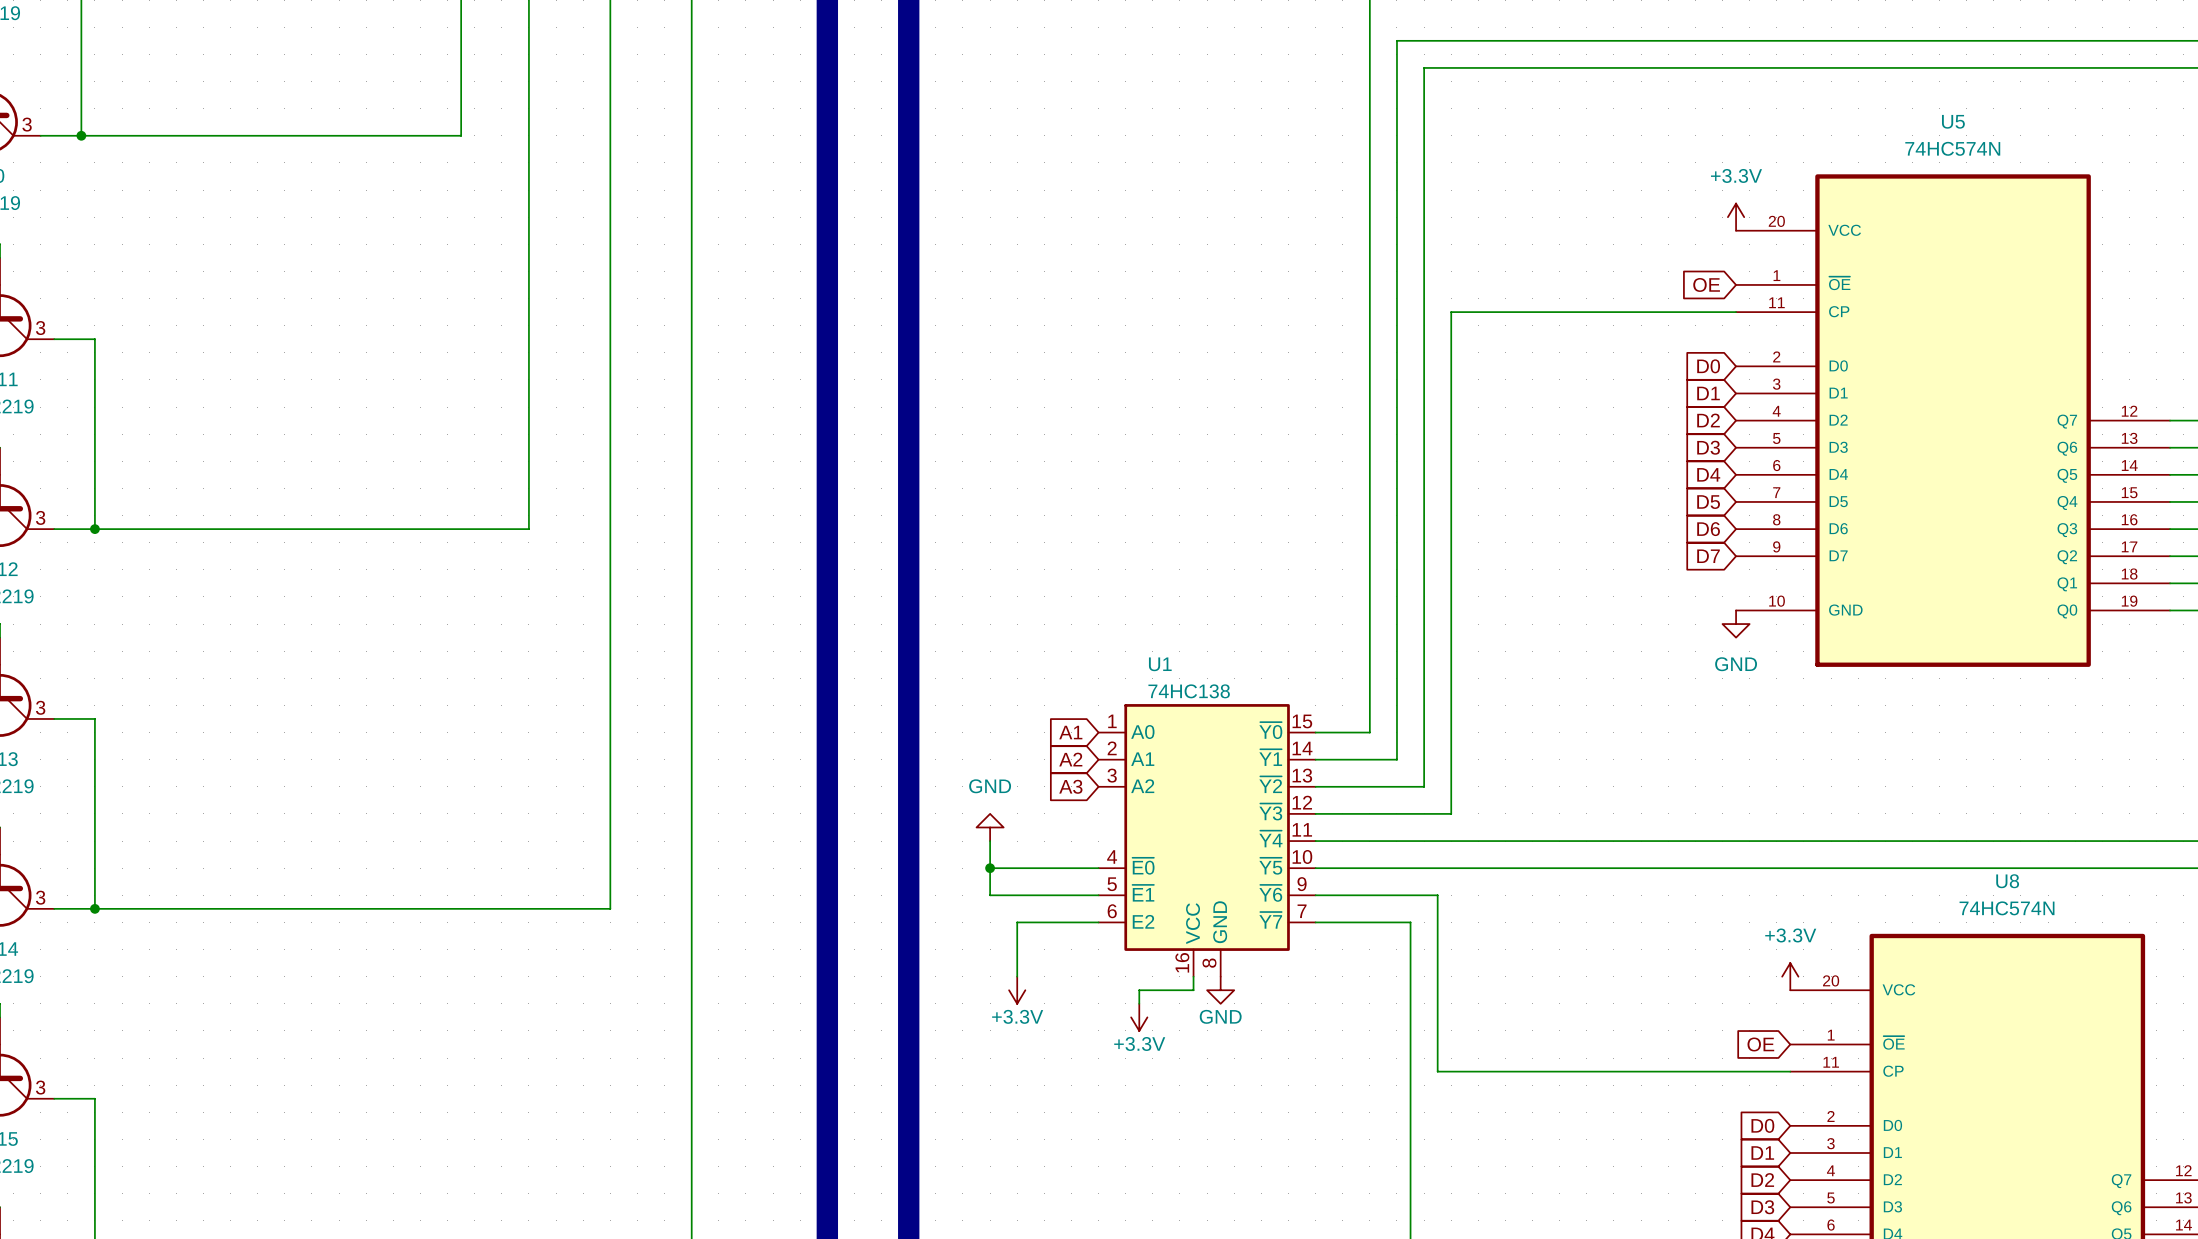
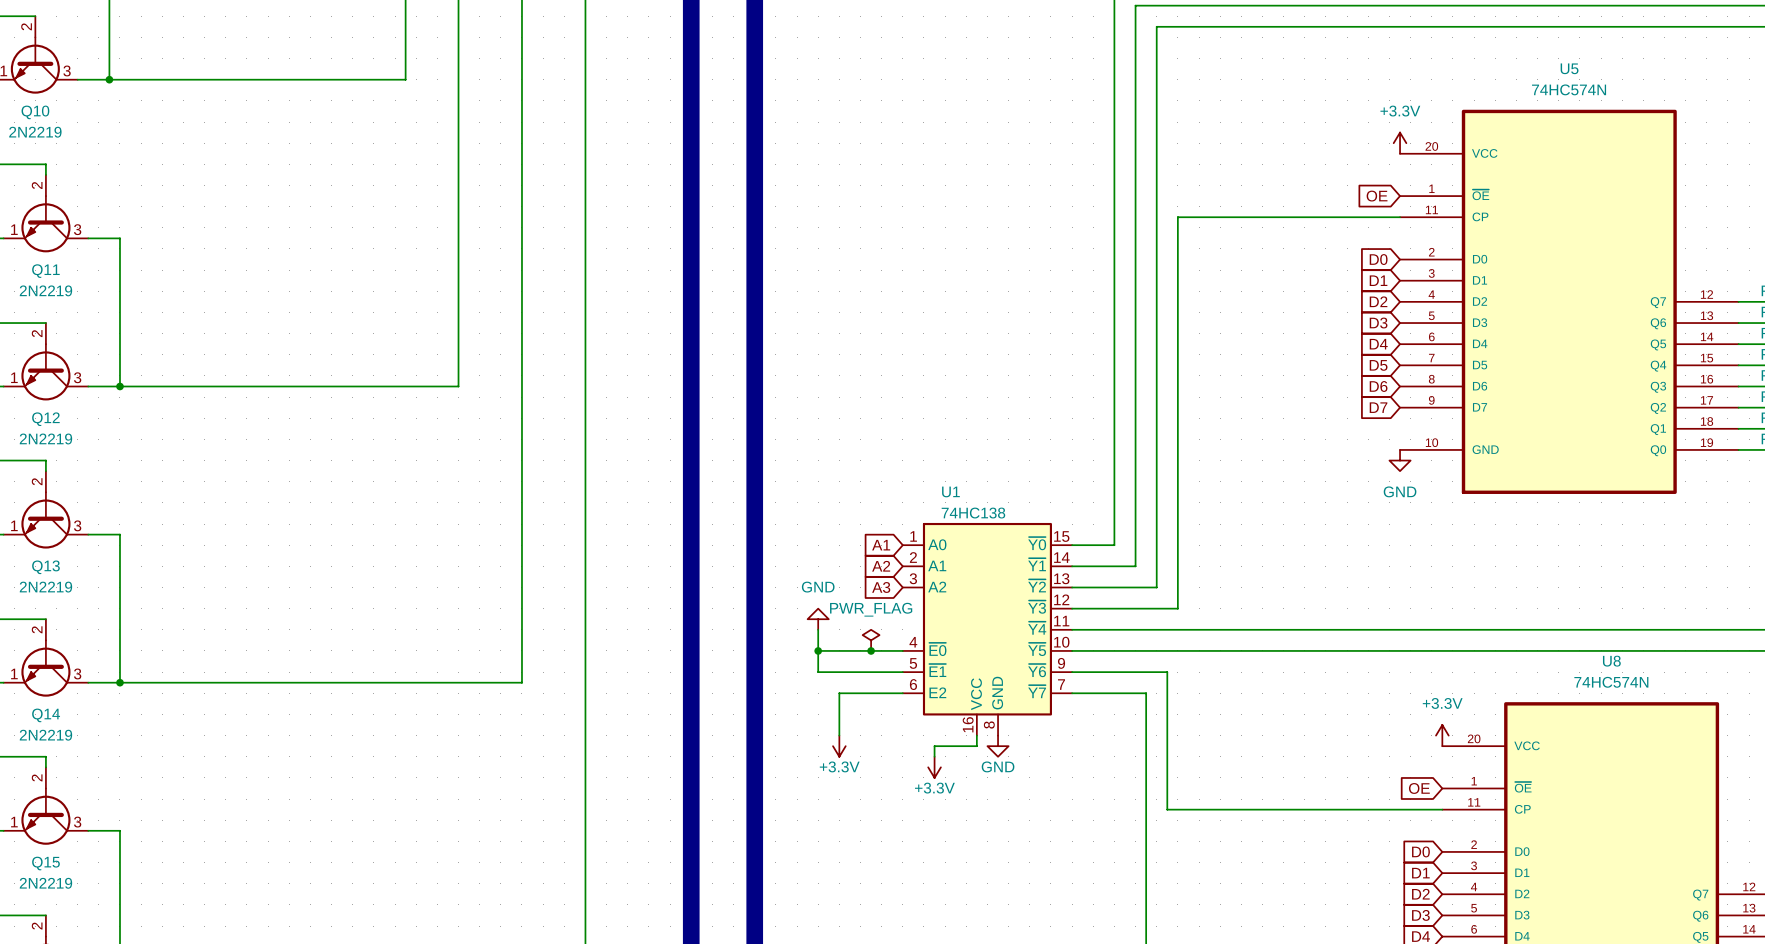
power symbol: none -> PWR_FLAG (871, 640)
junction: none -> (871, 650)

